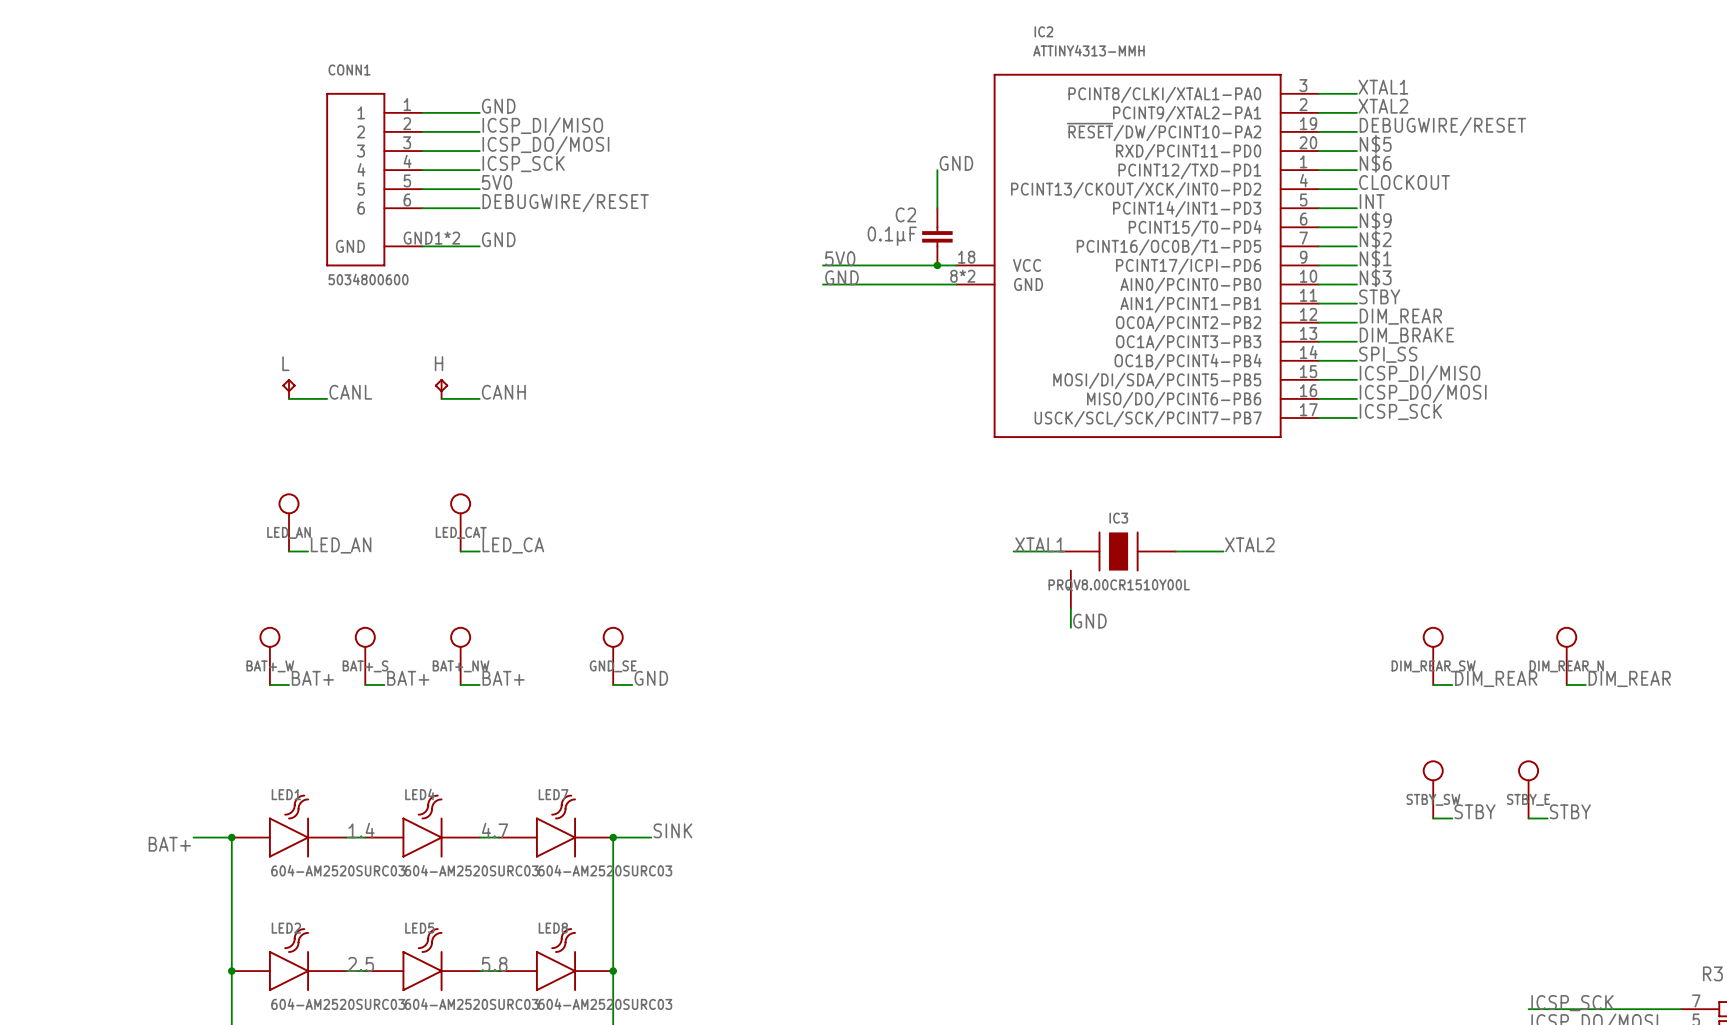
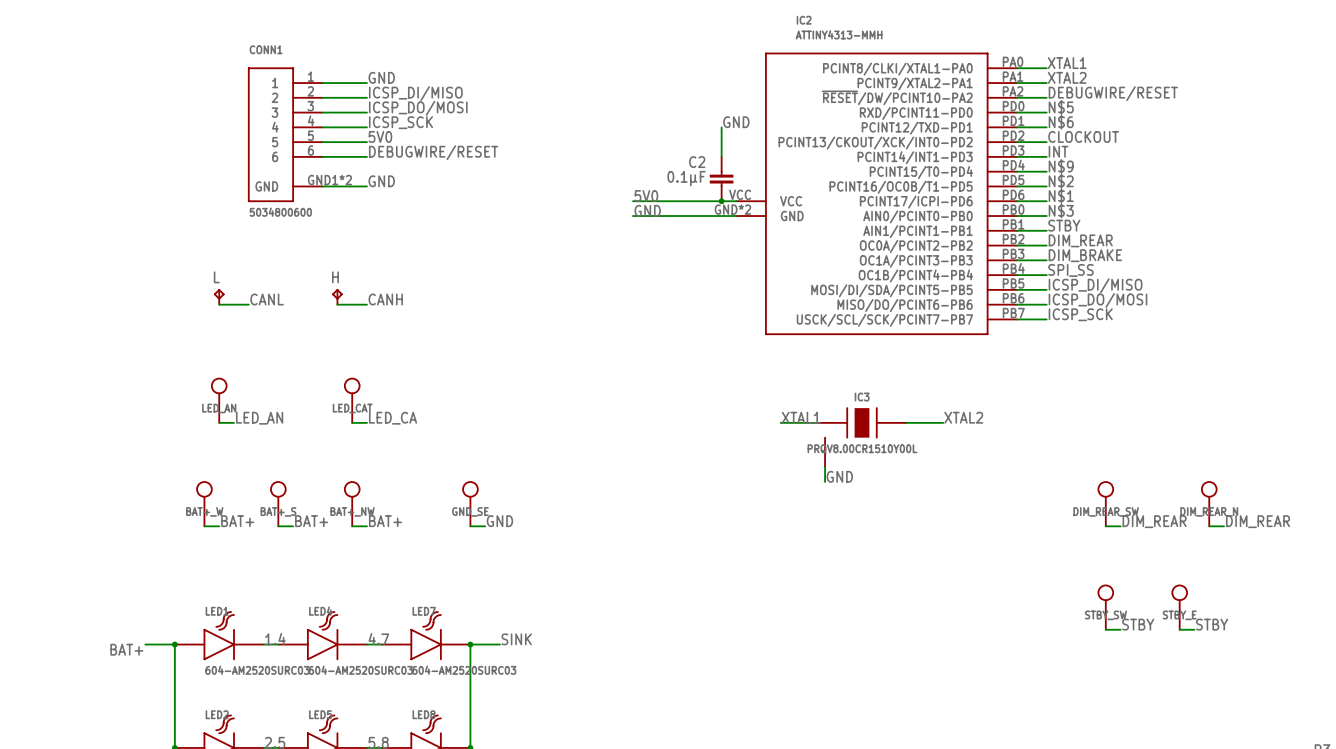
IC2 symbol: [956, 73, 1319, 439] -> [736, 52, 1018, 335]

